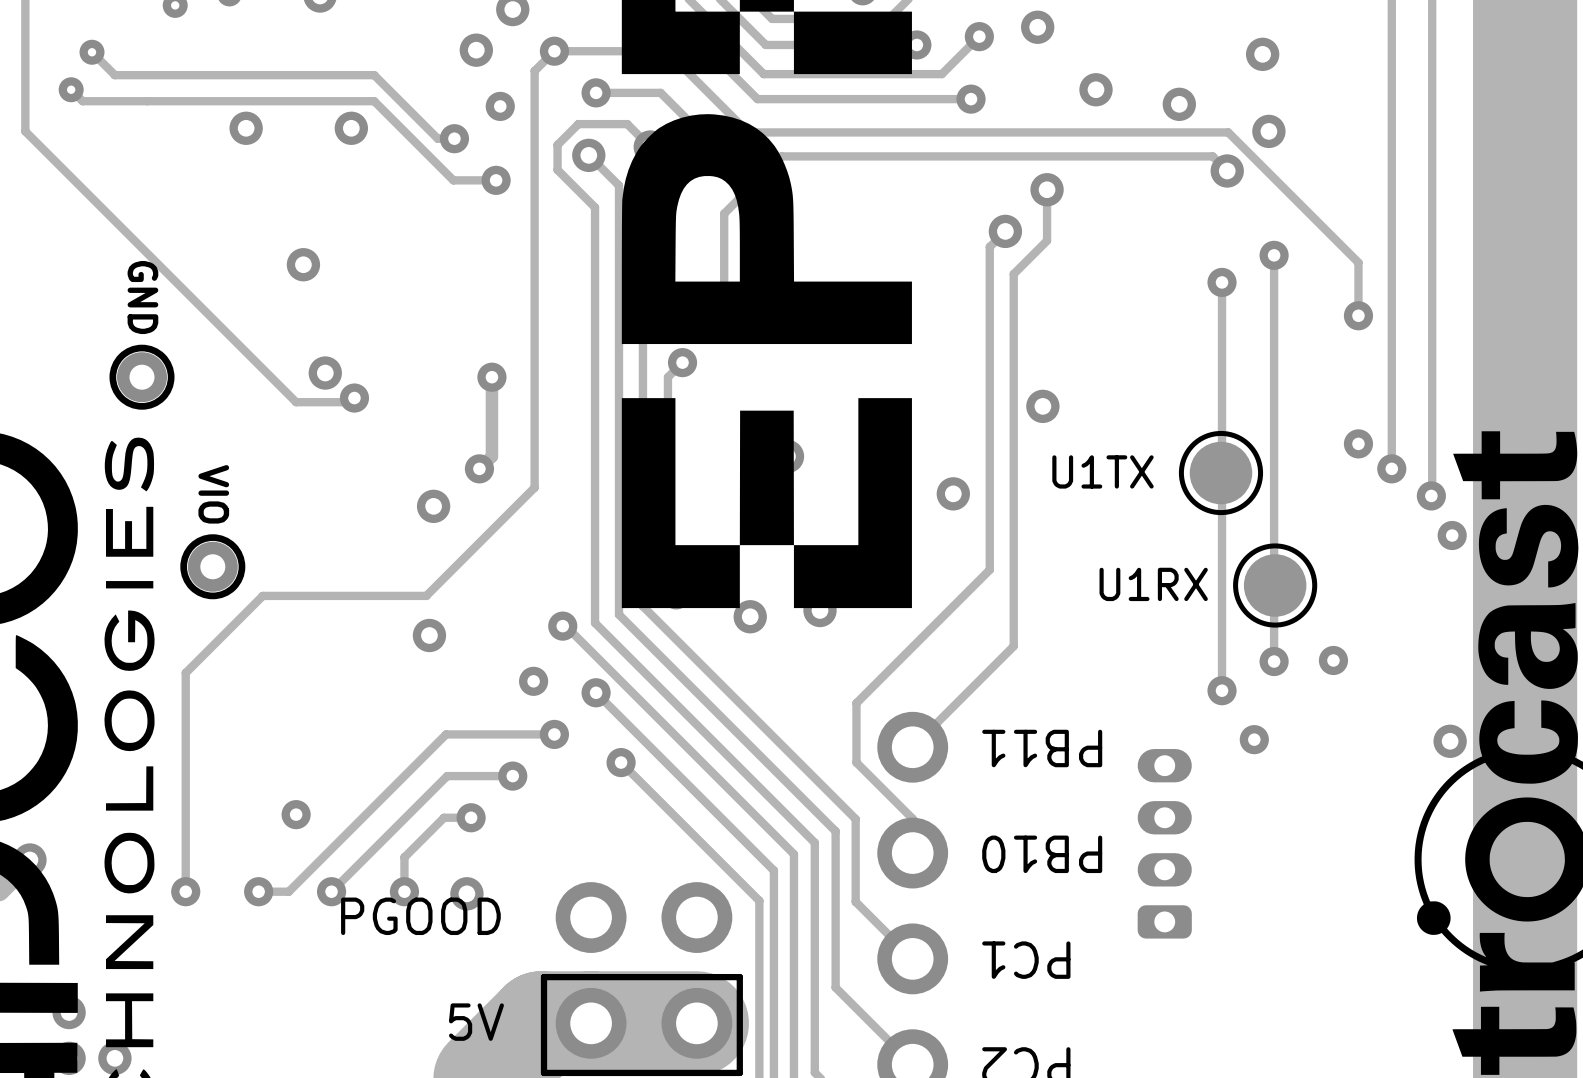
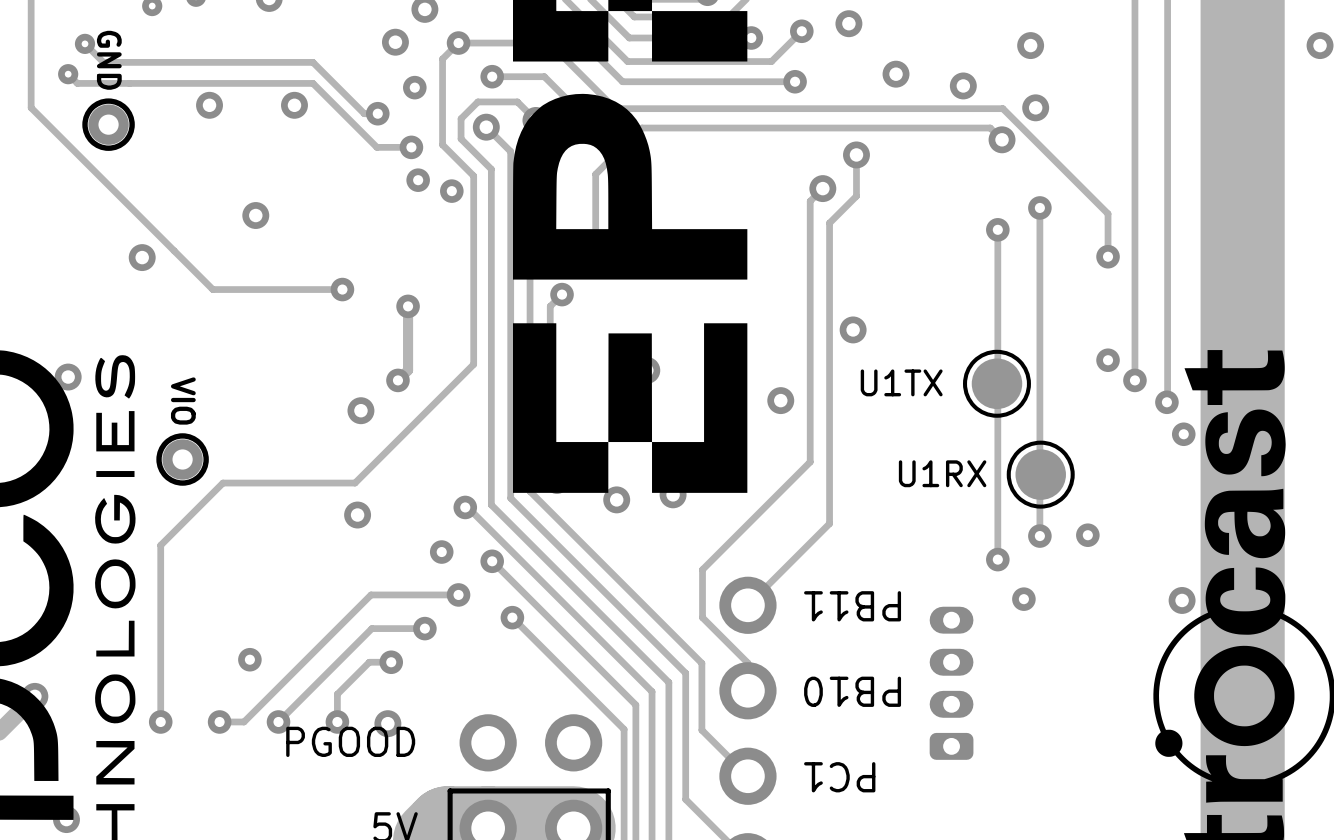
track: (534, 177) (534, 487) -> (442, 144) (473, 175) (473, 364) (442, 395)
via: none -> (418, 180)
via: none -> (451, 191)
via: none -> (142, 257)
track: (250, 356) (296, 402) (350, 402) (354, 398) -> (212, 289) (342, 289)
via: (325, 373) -> none
part position: (141, 377) -> (108, 124)
via position: (354, 398) -> (342, 289)
via: none -> (68, 377)

